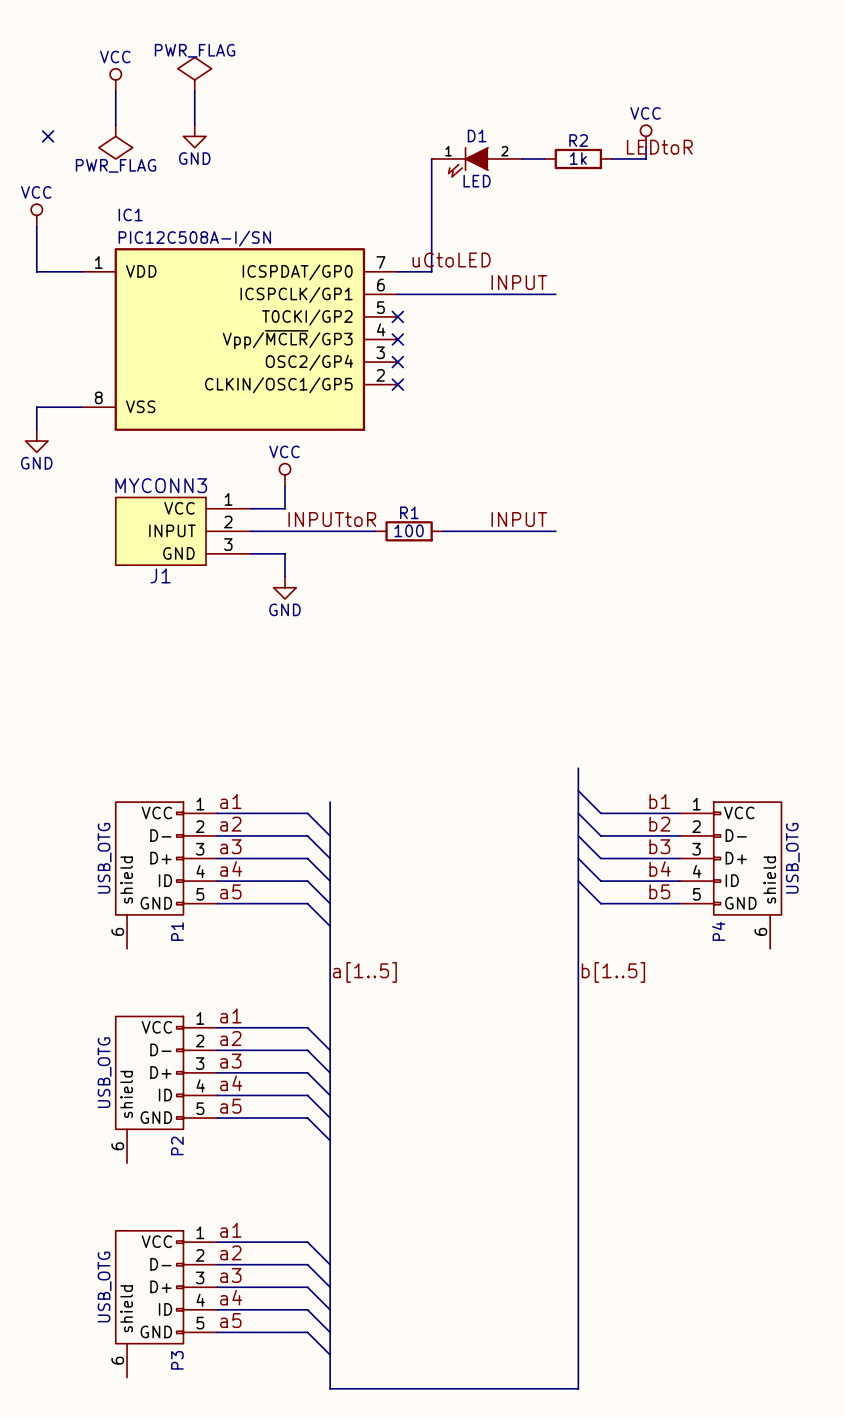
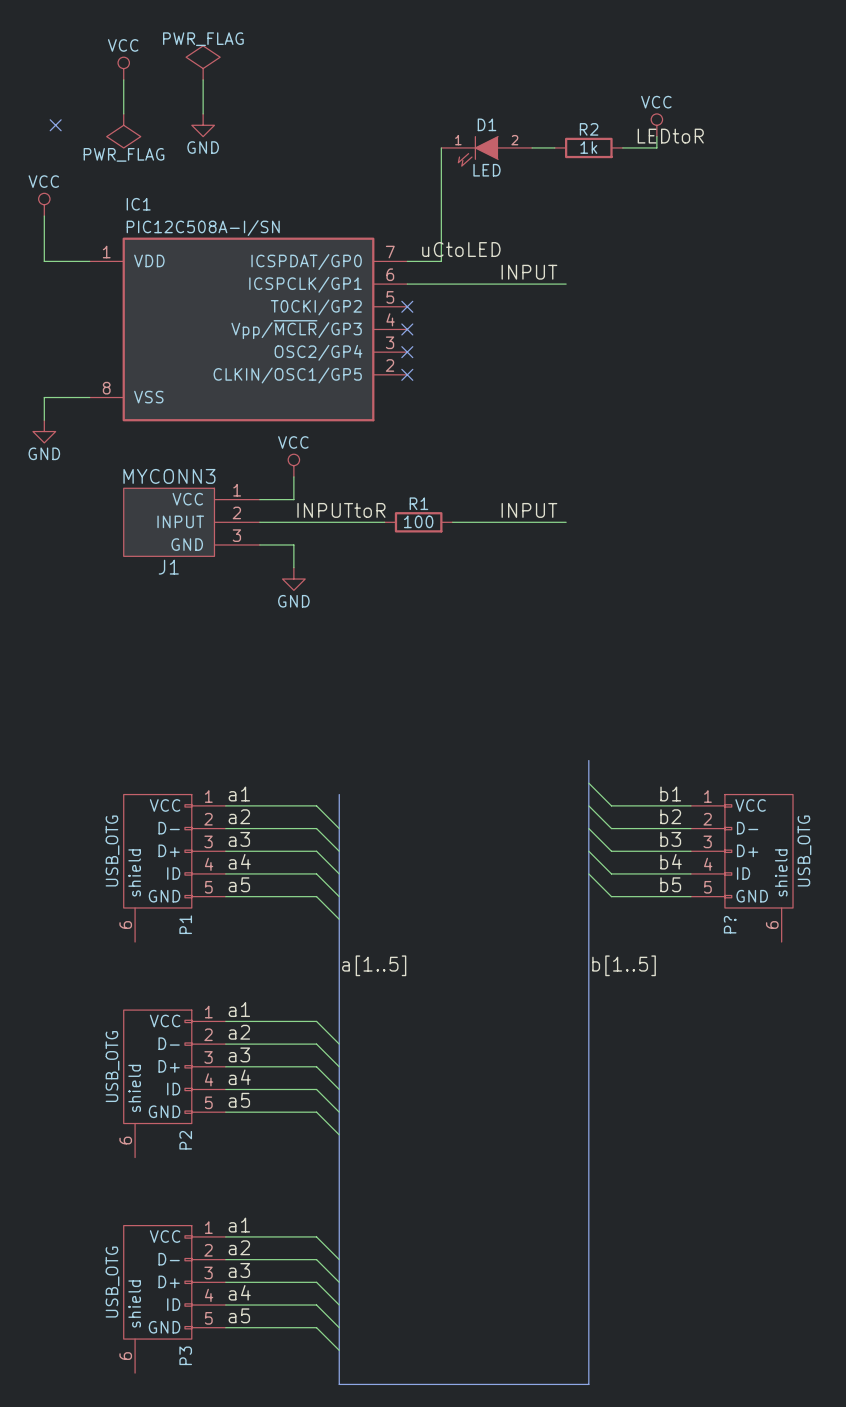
P4 name: P4 (718, 931) -> P? (730, 924)

